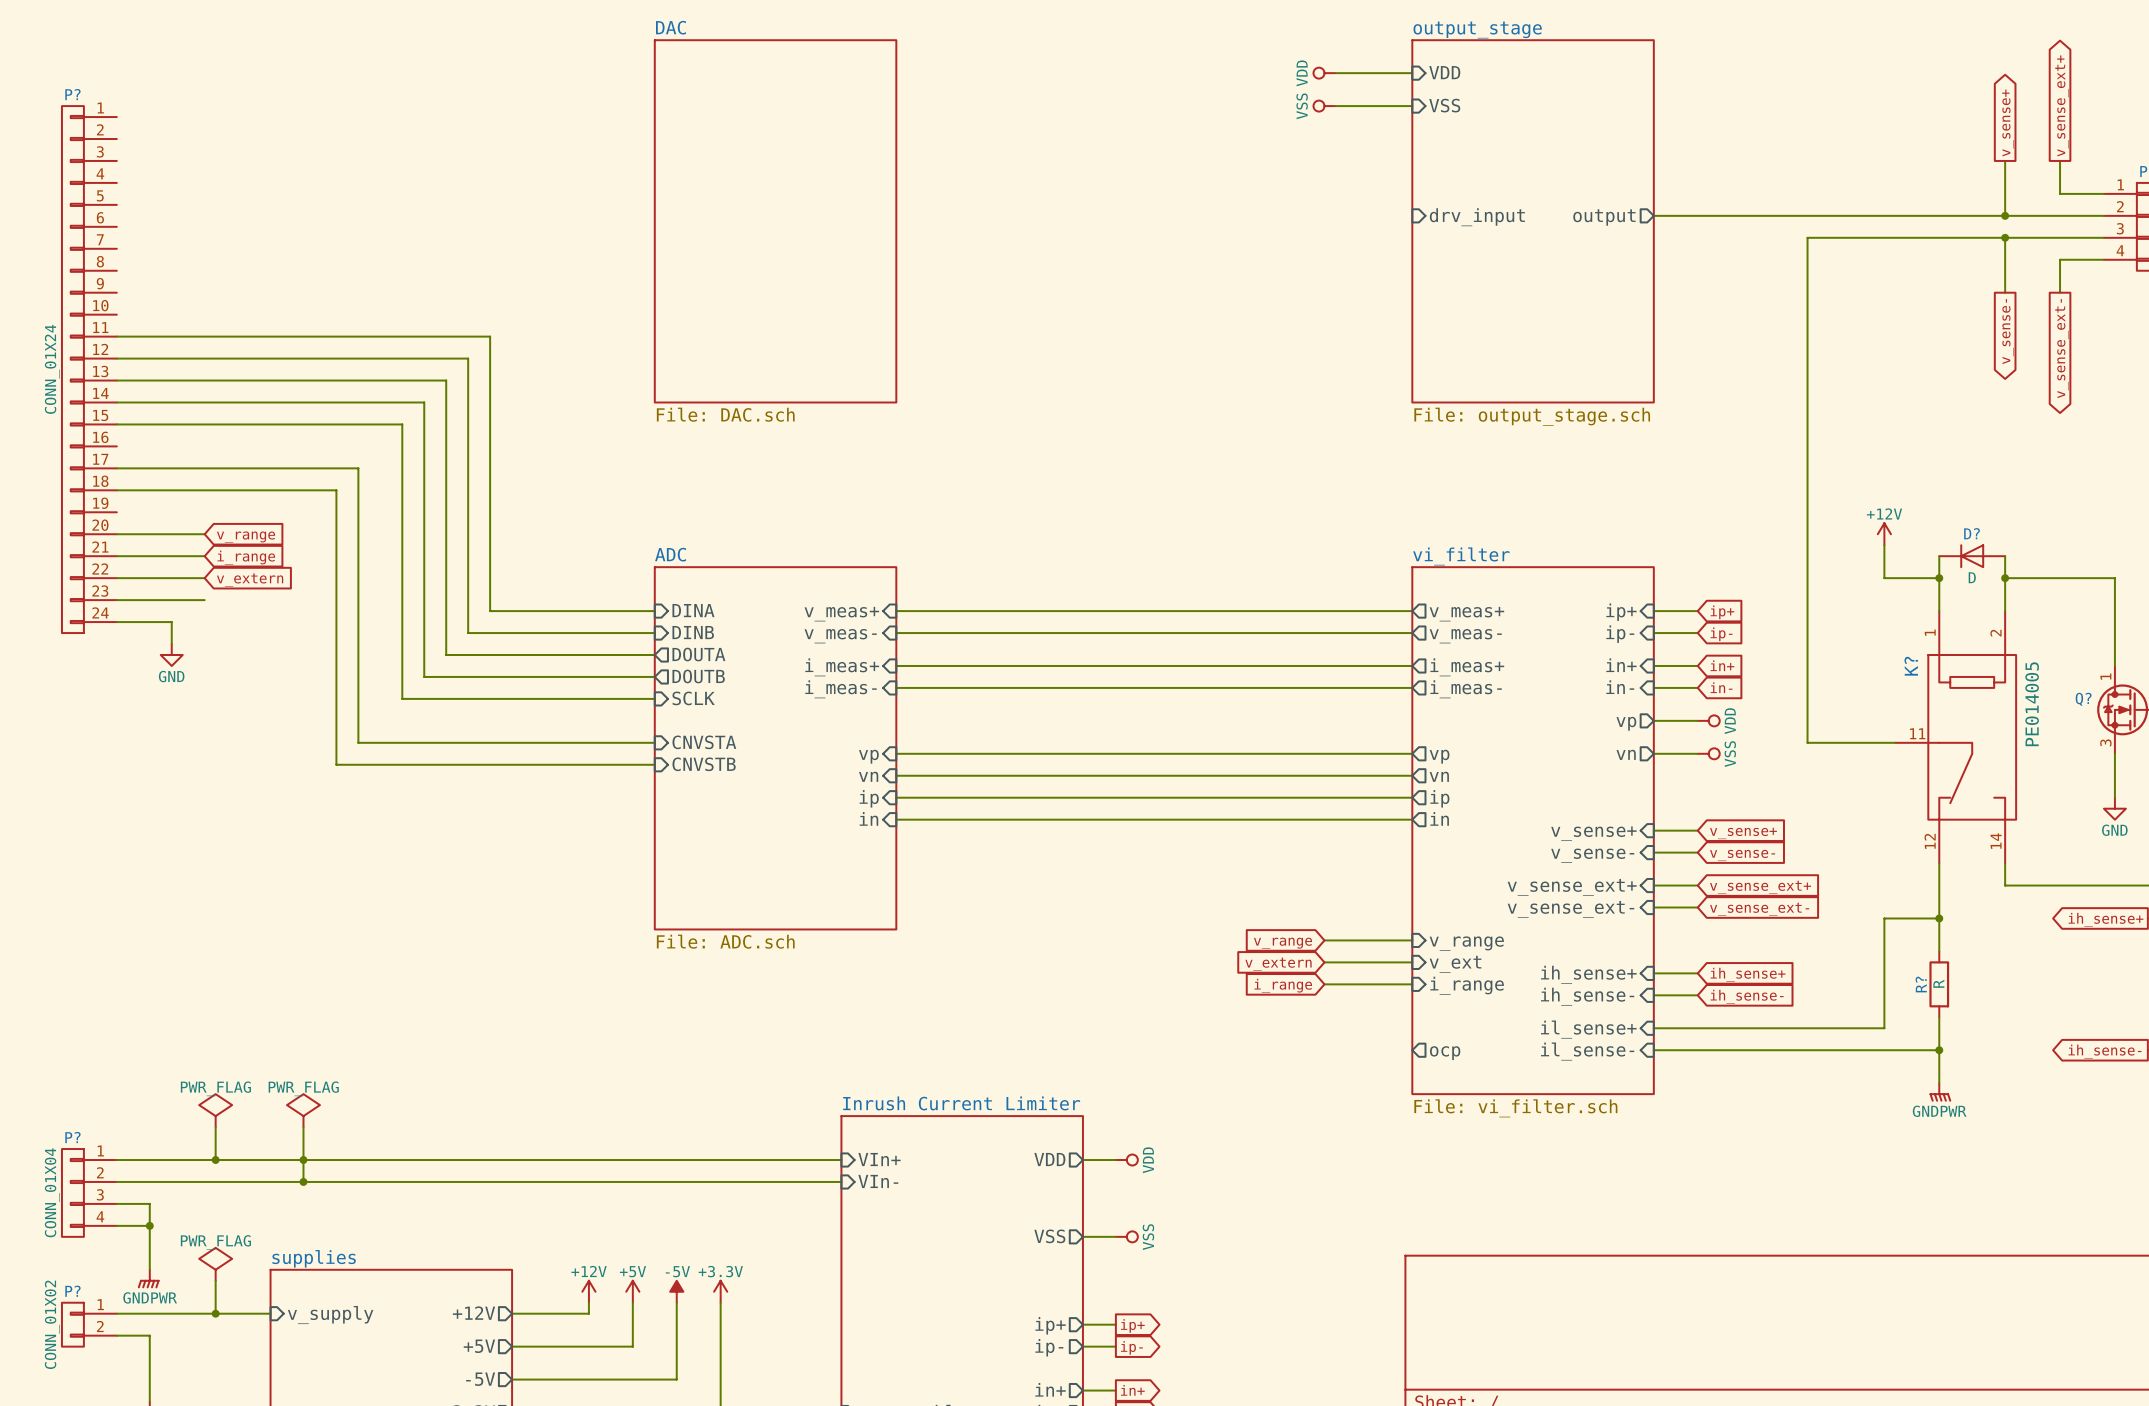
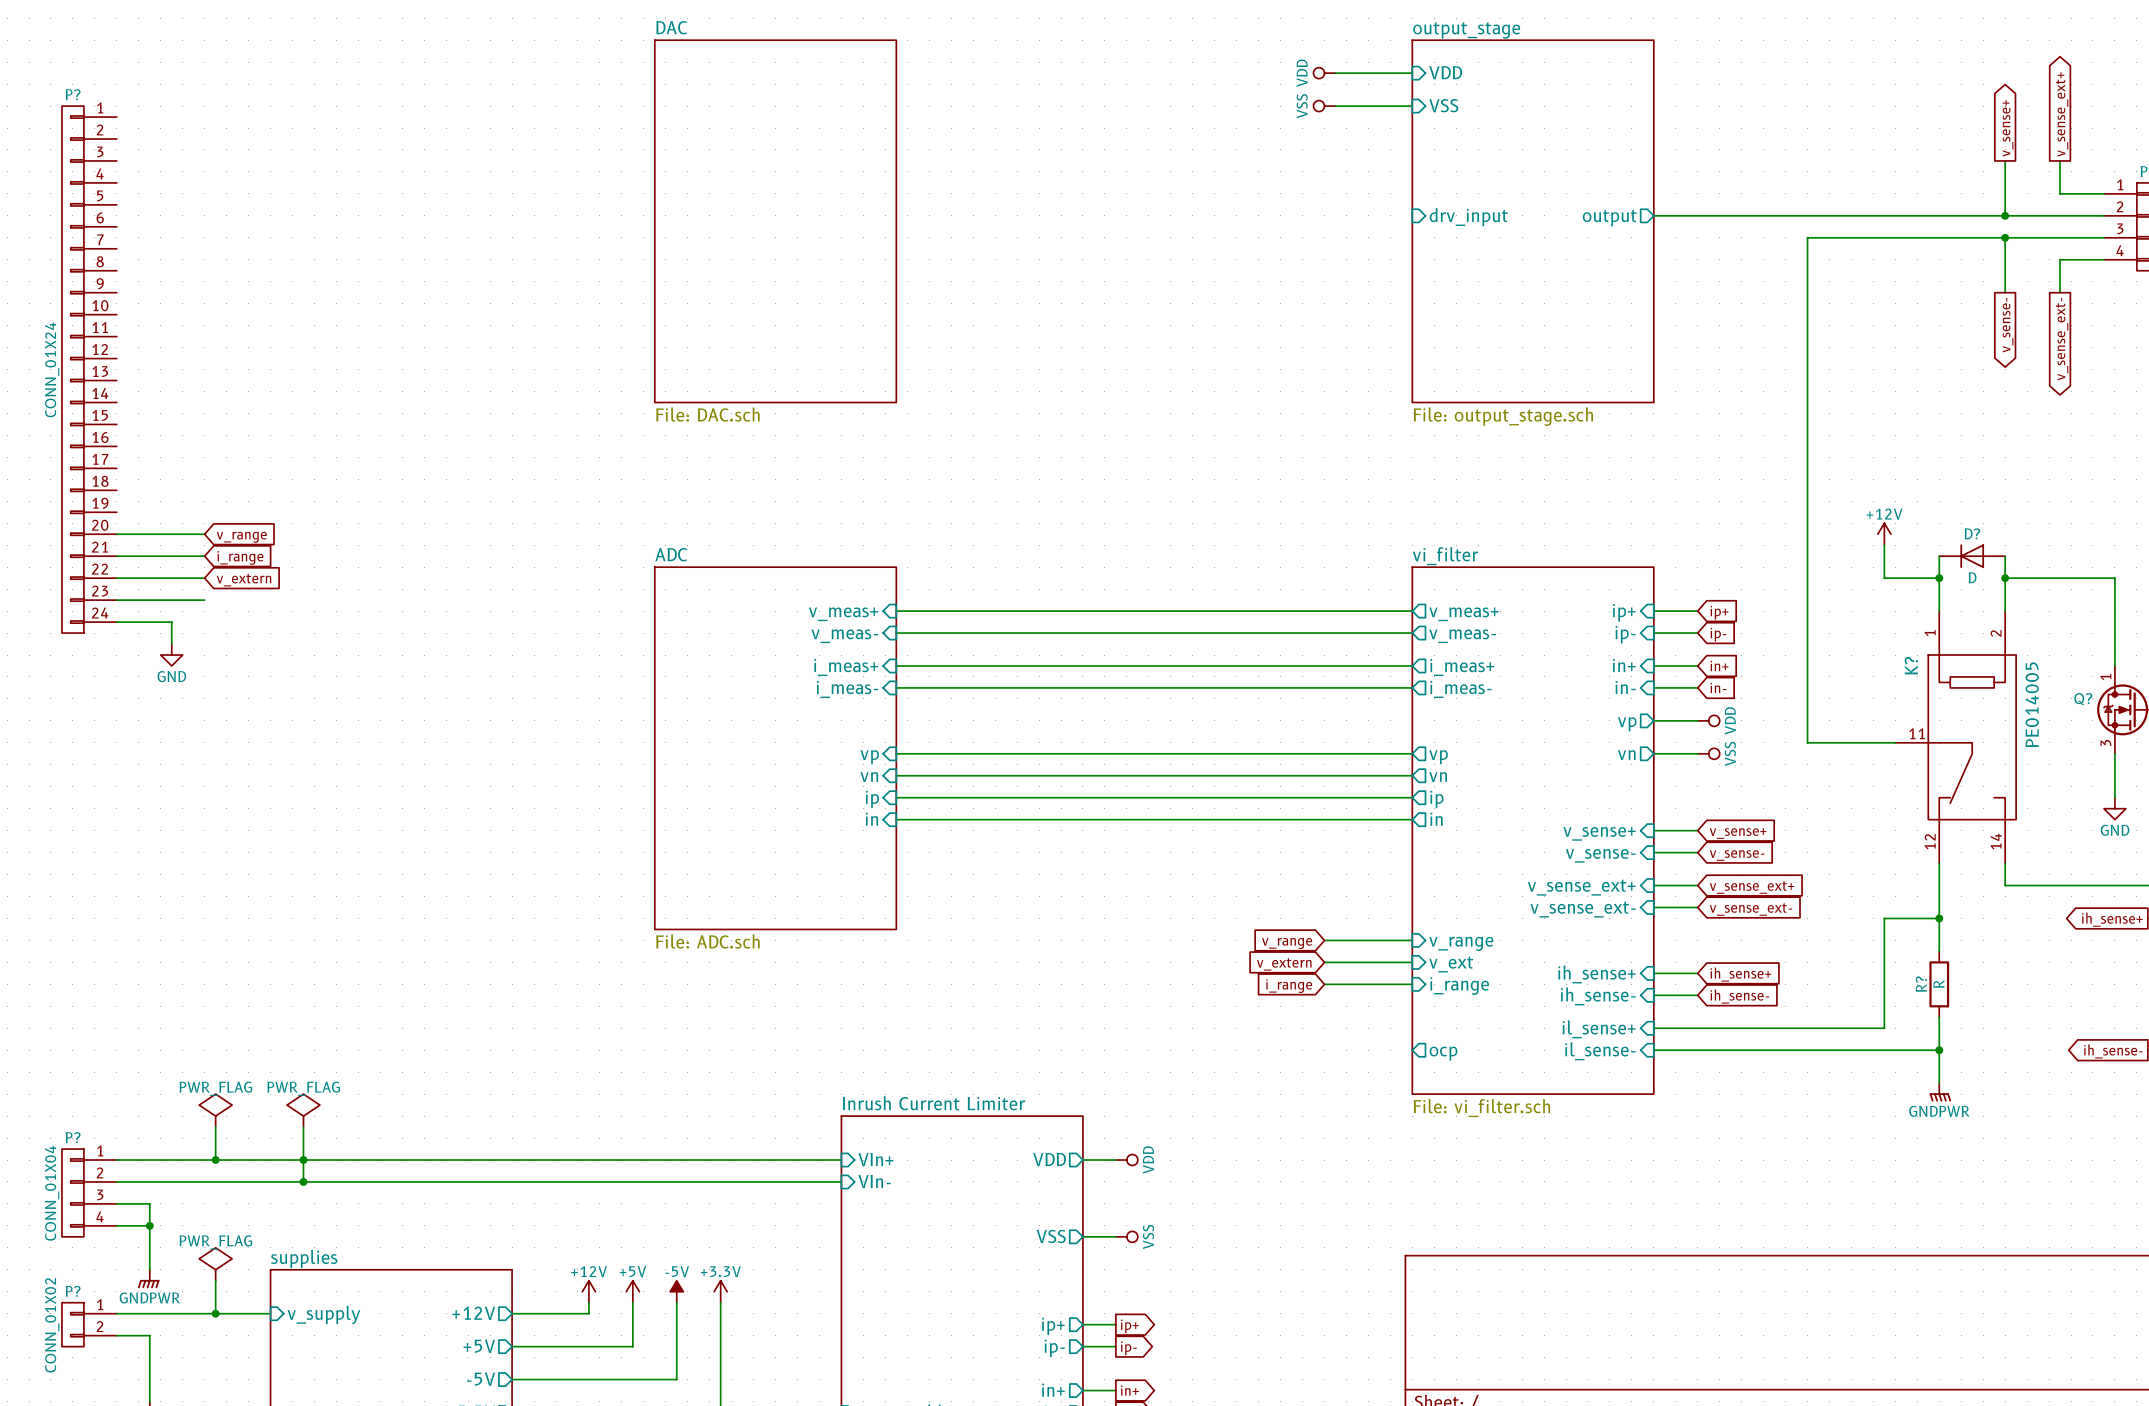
wire: (116, 336) (490, 336) (490, 611) (654, 611) -> none
wire: (116, 358) (468, 358) (468, 633) (654, 633) -> none
wire: (116, 380) (446, 380) (446, 655) (654, 655) -> none
wire: (116, 402) (424, 402) (424, 676) (654, 676) -> none
wire: (116, 424) (402, 424) (402, 698) (654, 698) -> none
wire: (116, 468) (358, 468) (358, 742) (654, 742) -> none
wire: (116, 490) (336, 490) (336, 764) (654, 764) -> none
sheet pin: DINA (693, 610) -> none
sheet pin: DINB (693, 632) -> none
sheet pin: DOUTA (698, 654) -> none
sheet pin: DOUTB (698, 676) -> none
sheet pin: SCLK (693, 698) -> none
sheet pin: CNVSTA (704, 742) -> none
sheet pin: CNVSTB (704, 764) -> none

